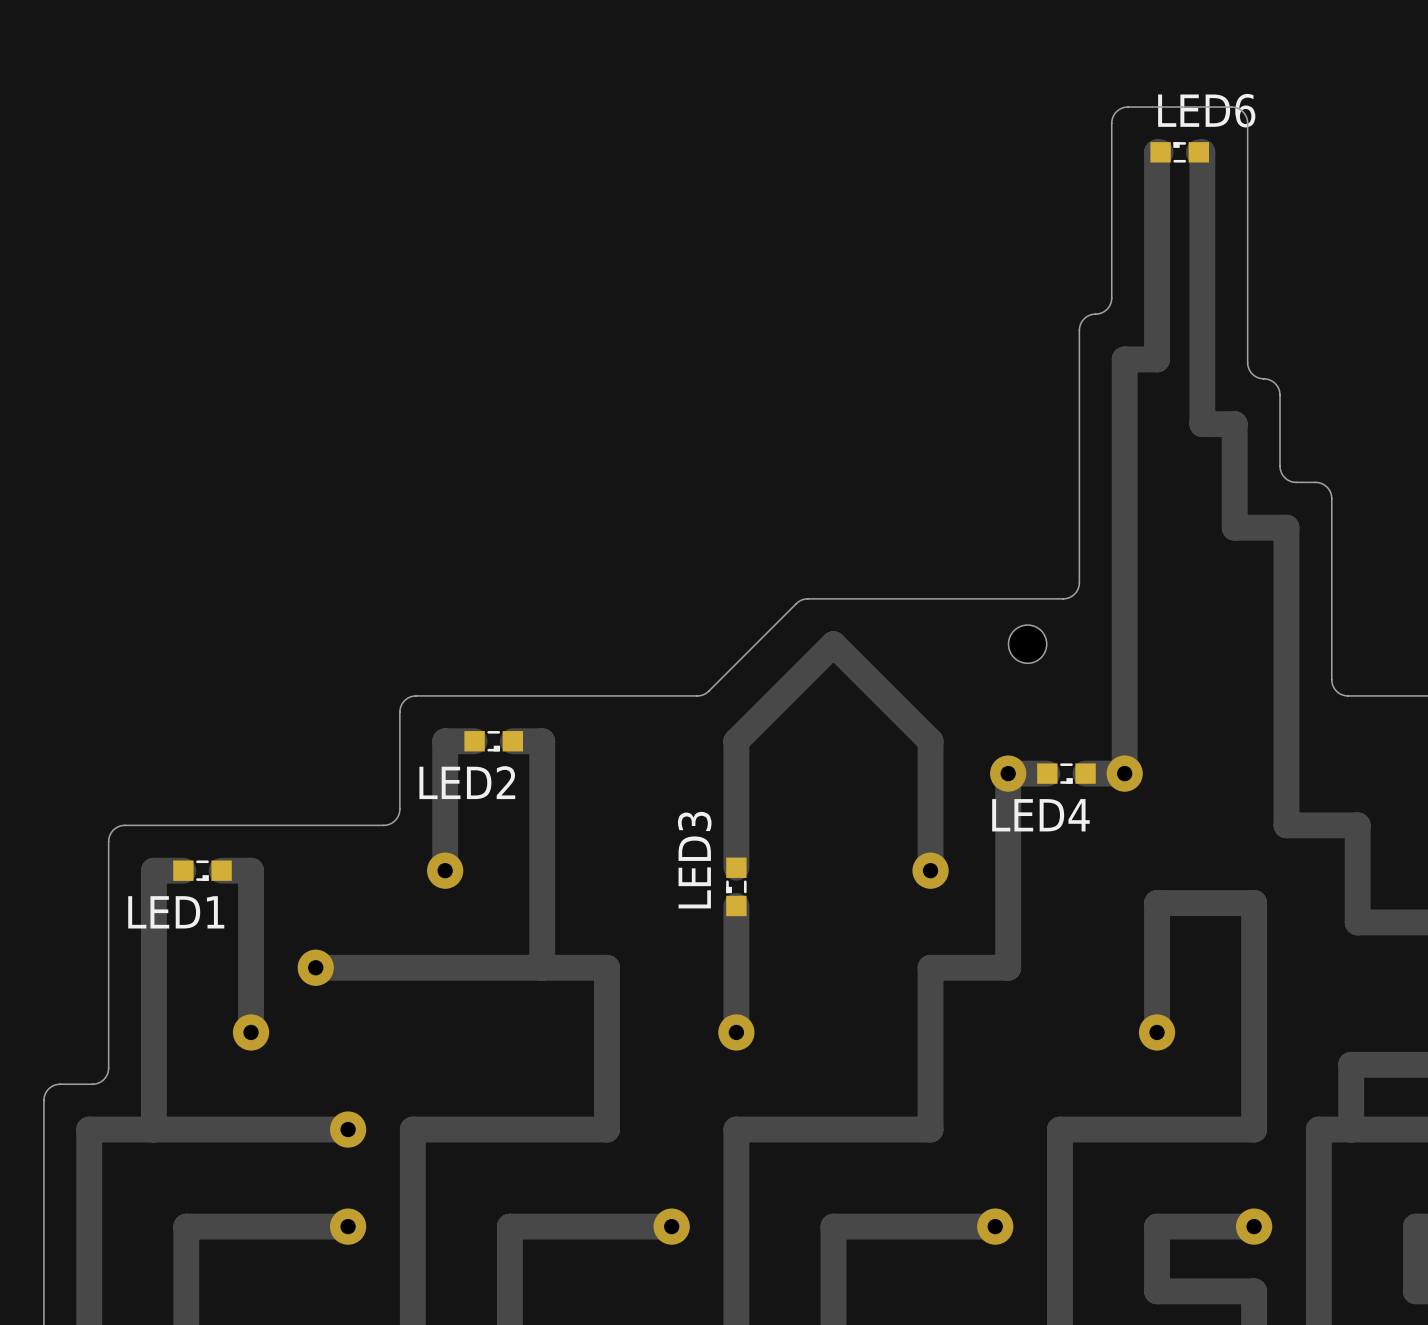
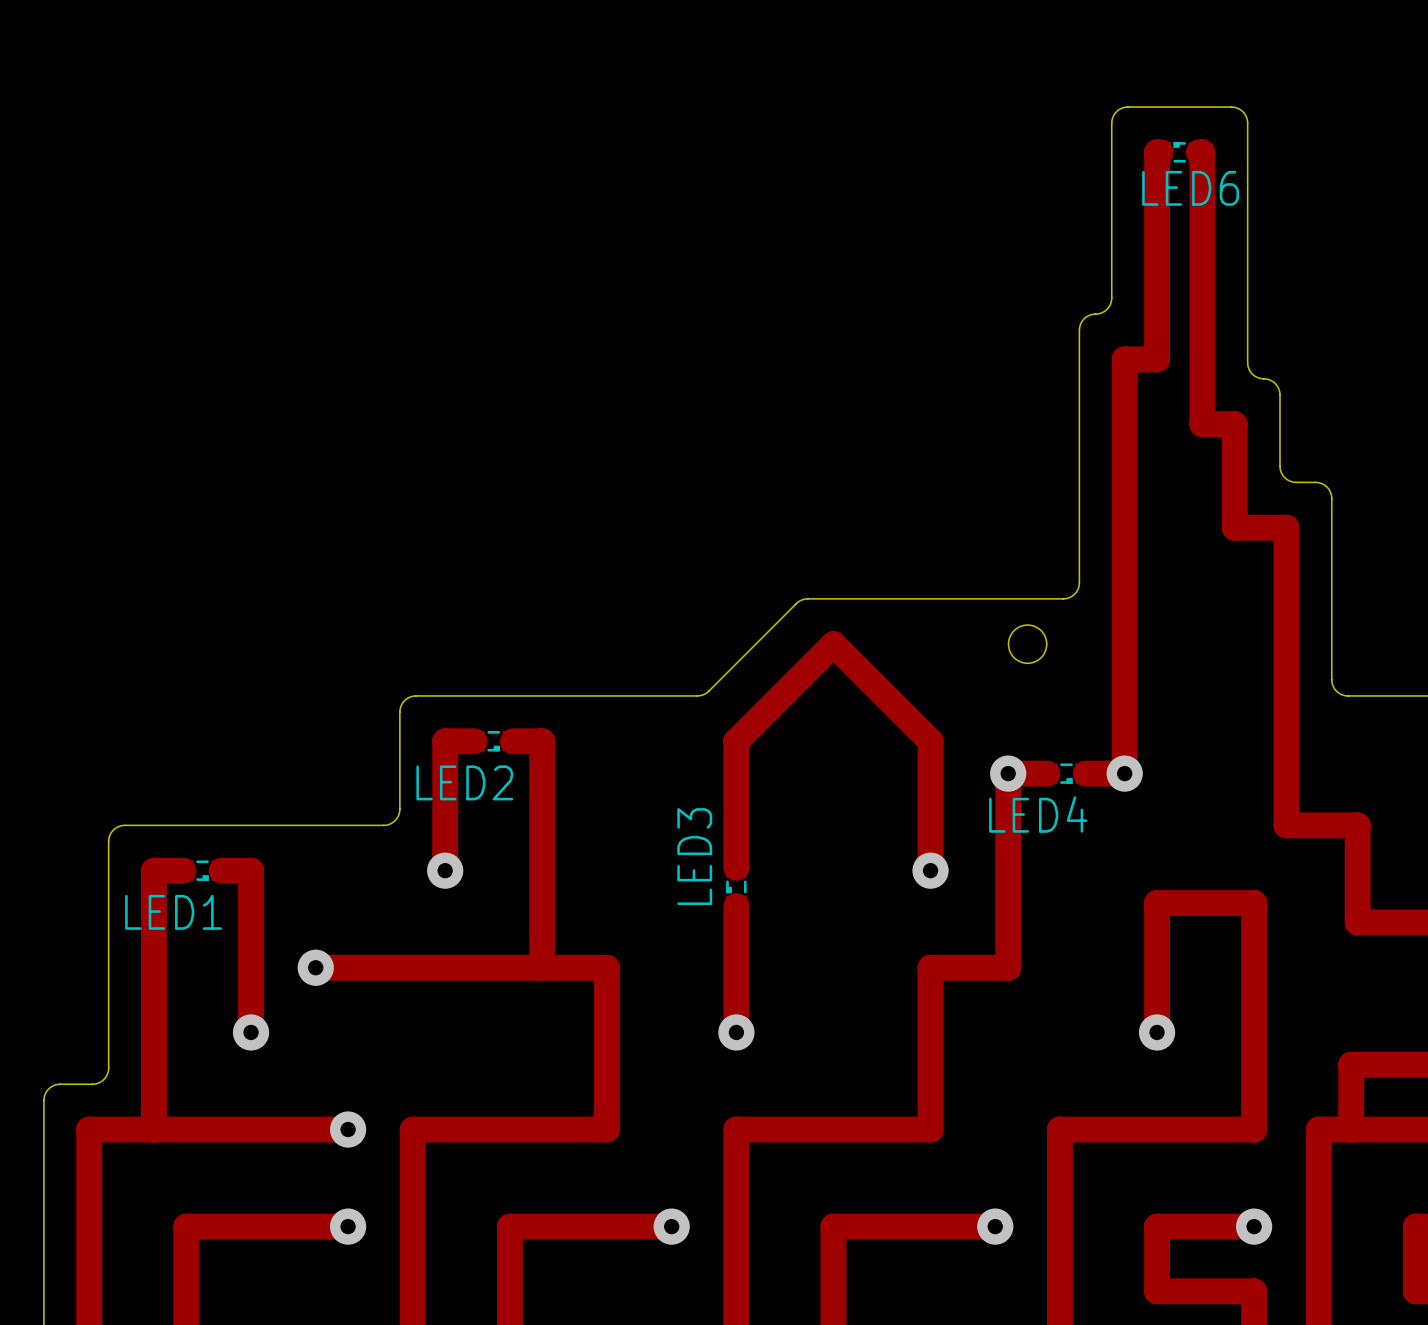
LED6 name position: LED6 (1206, 110) -> LED6 (1190, 188)

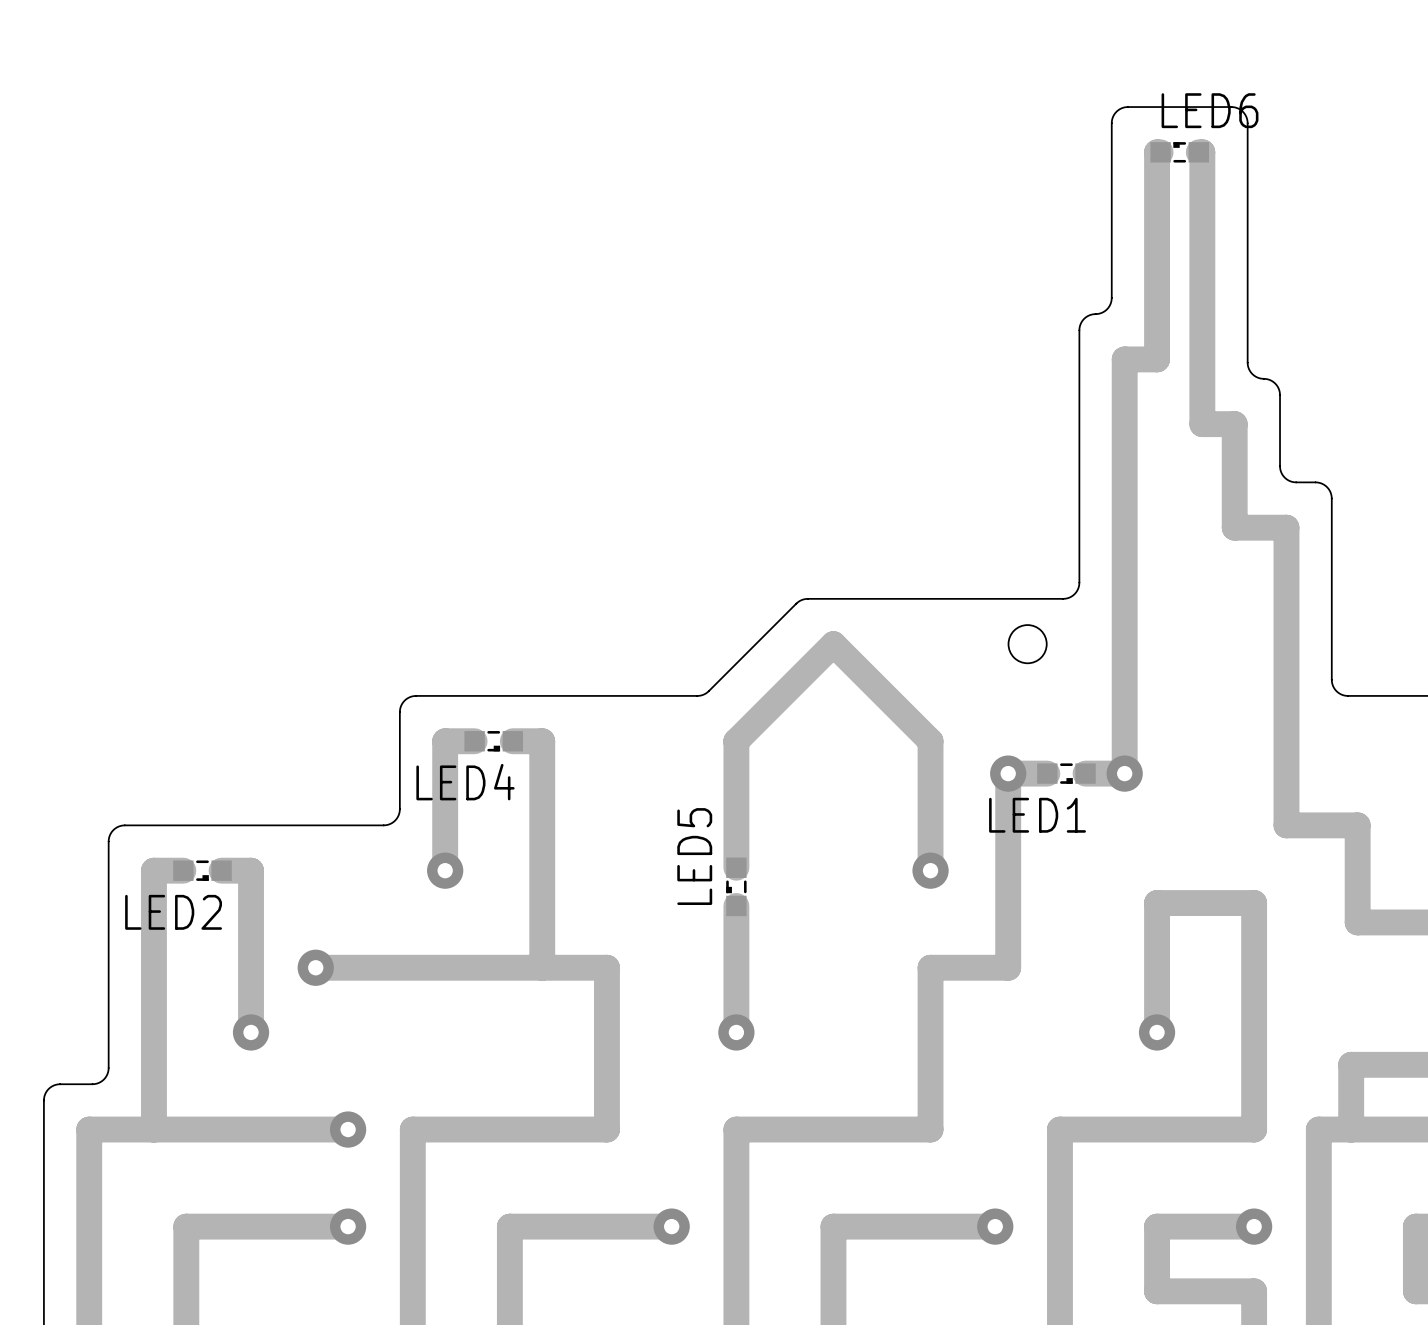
LED6 name position: LED6 (1190, 188) -> LED6 (1210, 110)
LED2 name: LED2 (464, 782) -> LED4 (465, 782)
LED4 name: LED4 (1038, 814) -> LED1 (1037, 815)
LED3 name: LED3 (694, 856) -> LED5 (694, 856)
LED1 name: LED1 (173, 912) -> LED2 (173, 912)

